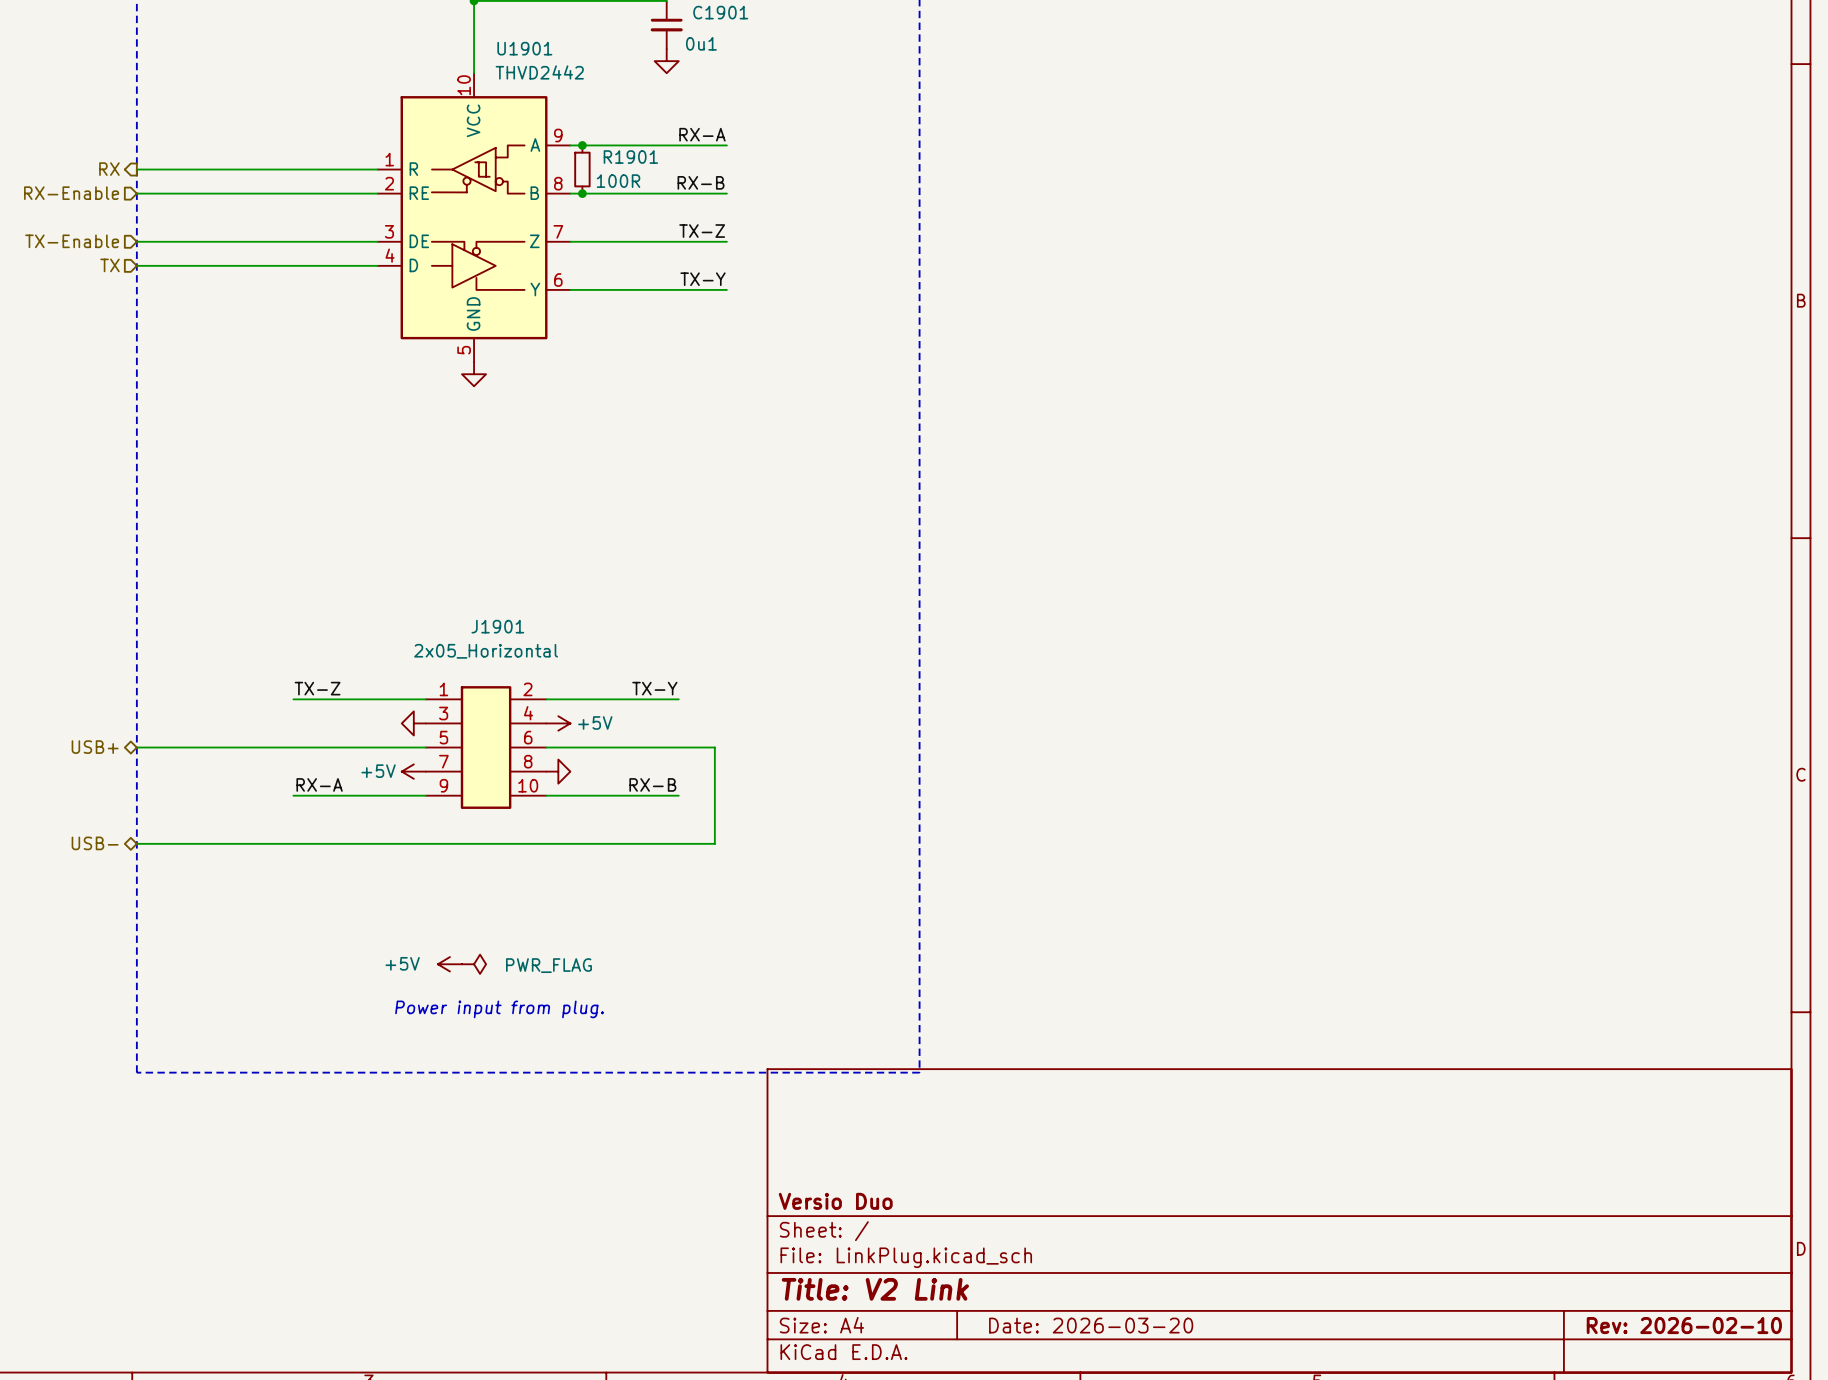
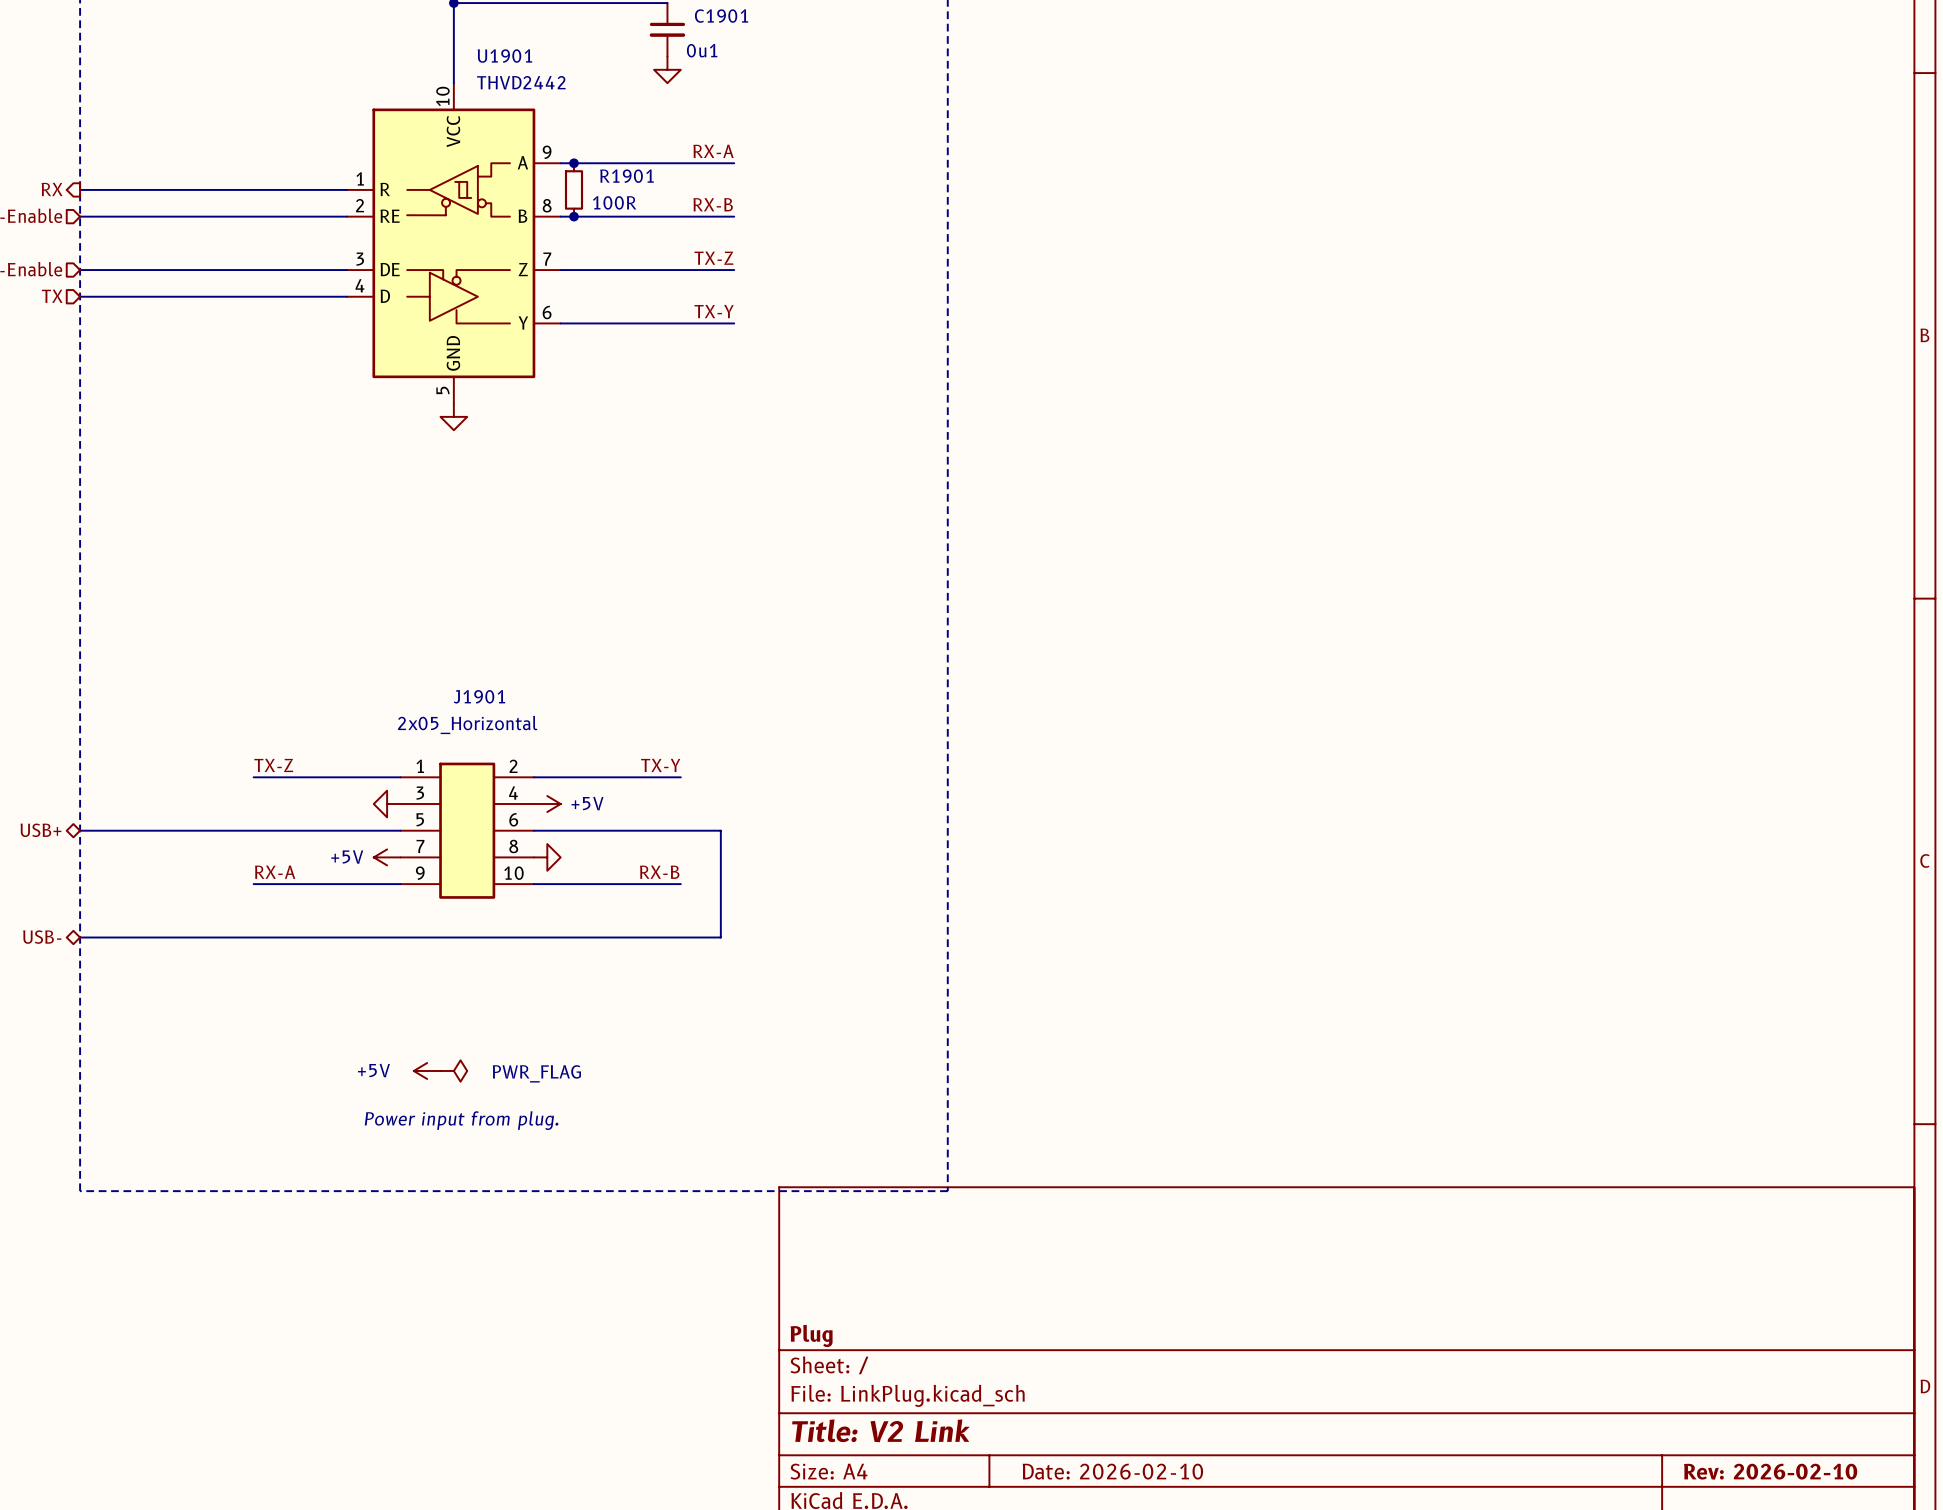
title block: Versio Duo (835, 1201) -> Plug (811, 1335)
title block: Date: 2026-03-20 (1091, 1325) -> Date: 2026-02-10 (1112, 1471)

